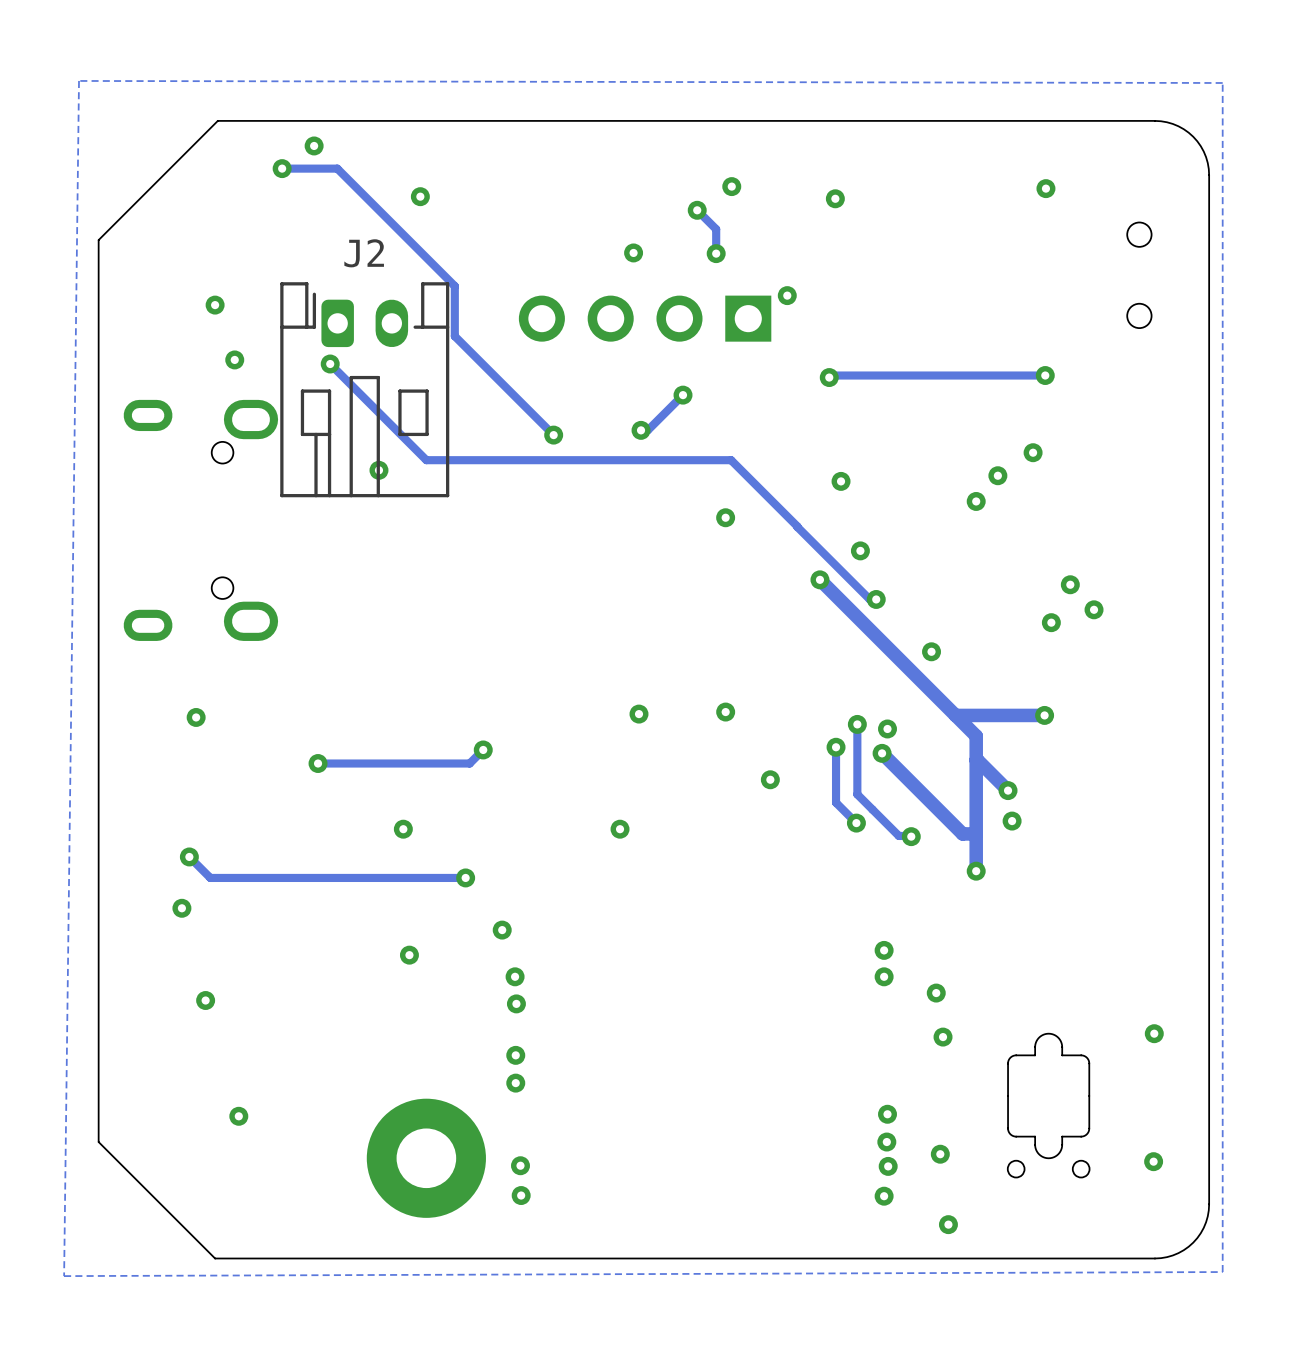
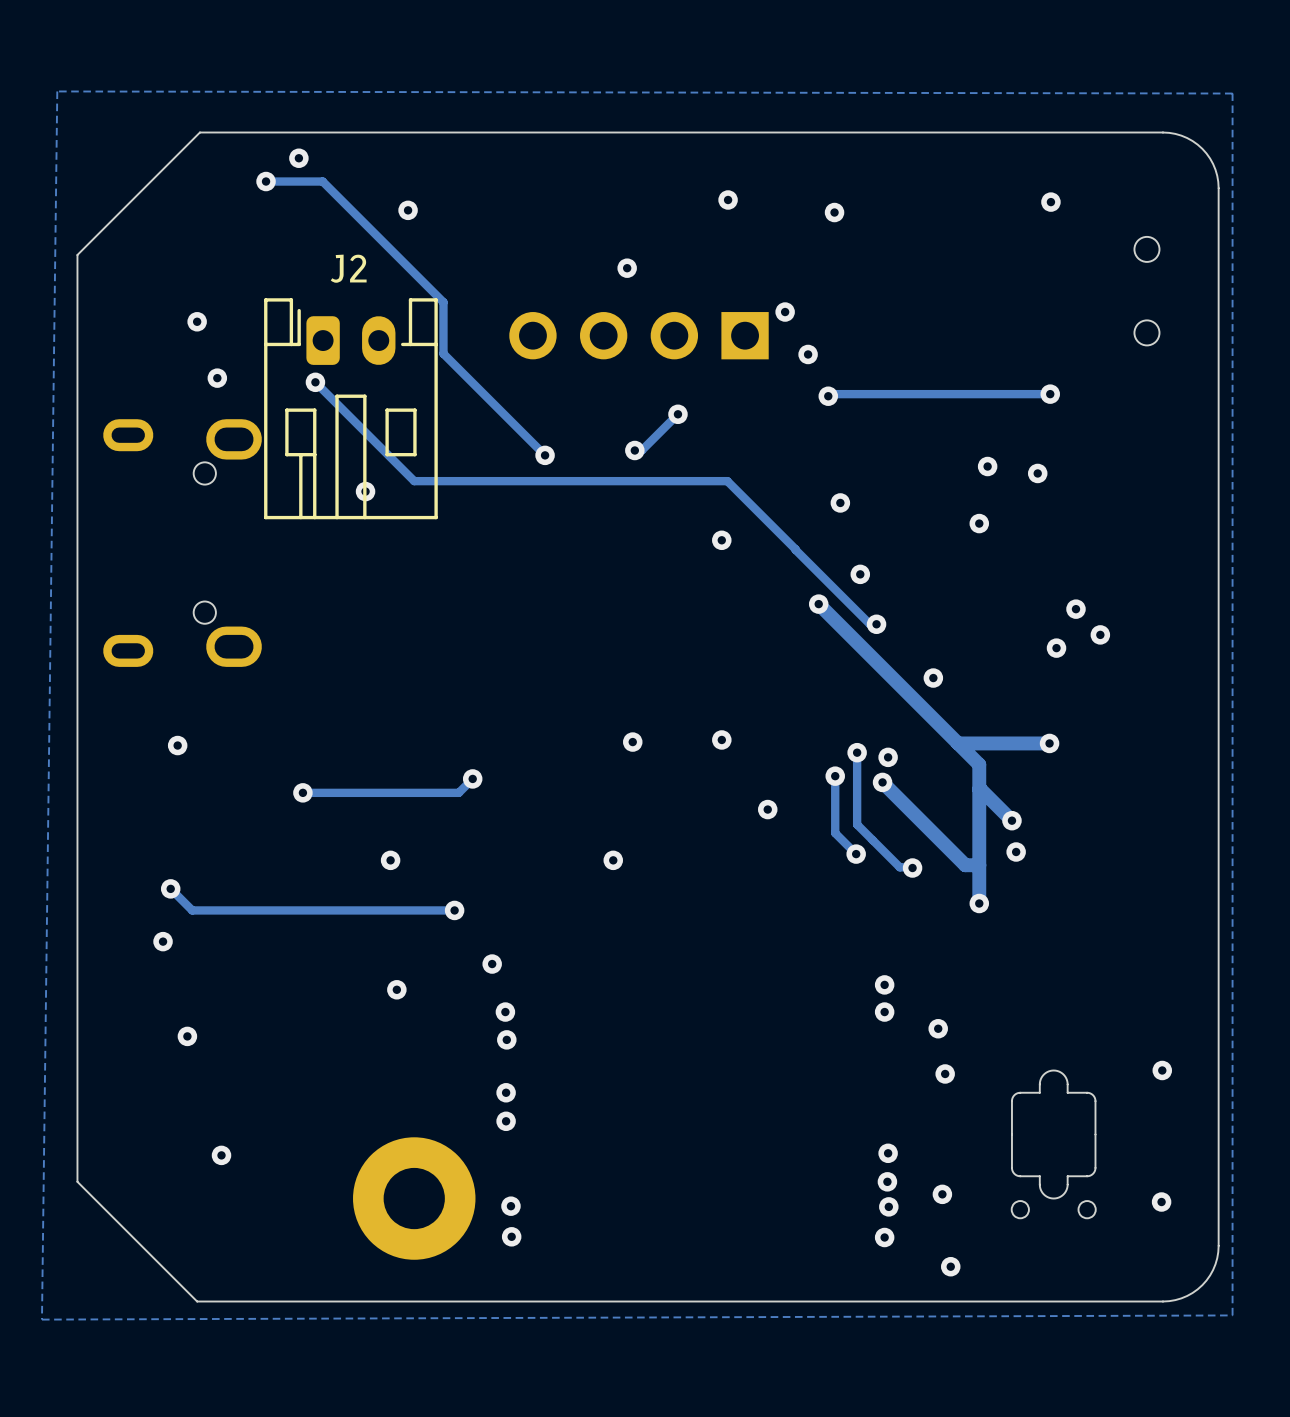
track: (697, 210) (716, 229) (716, 253) -> none
via: (697, 210) -> none
via: (716, 253) -> none
via: none -> (808, 354)
via position: (997, 475) -> (987, 466)

